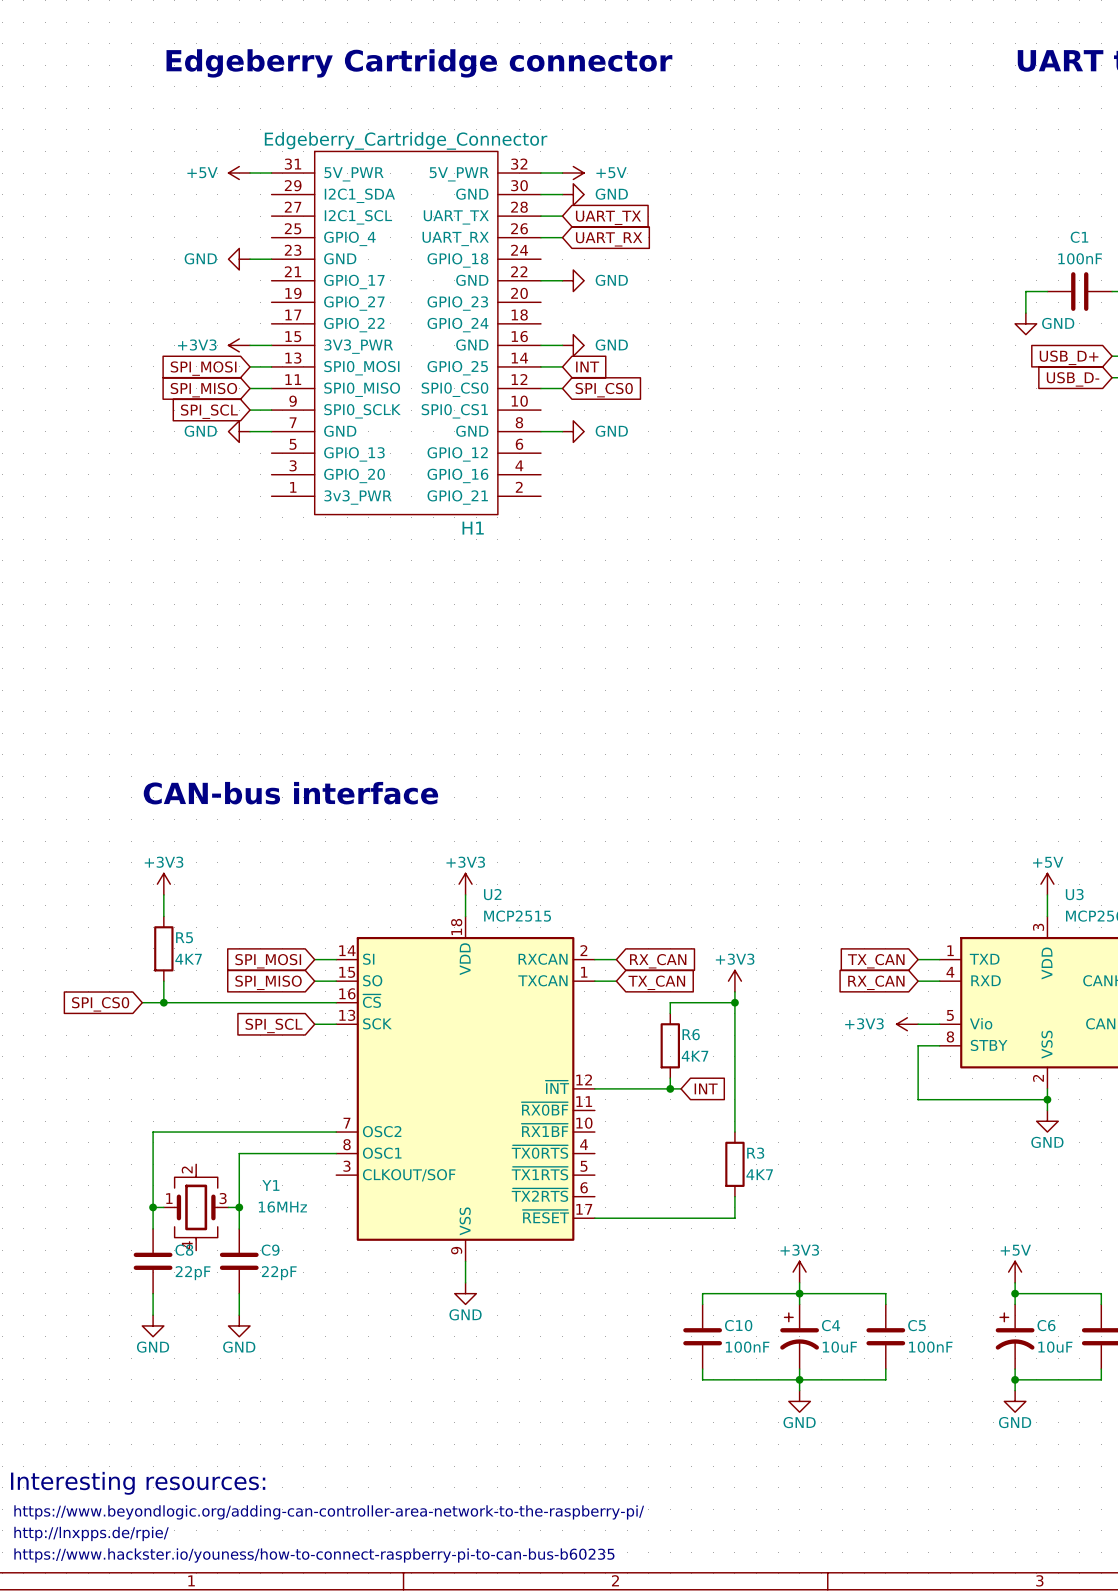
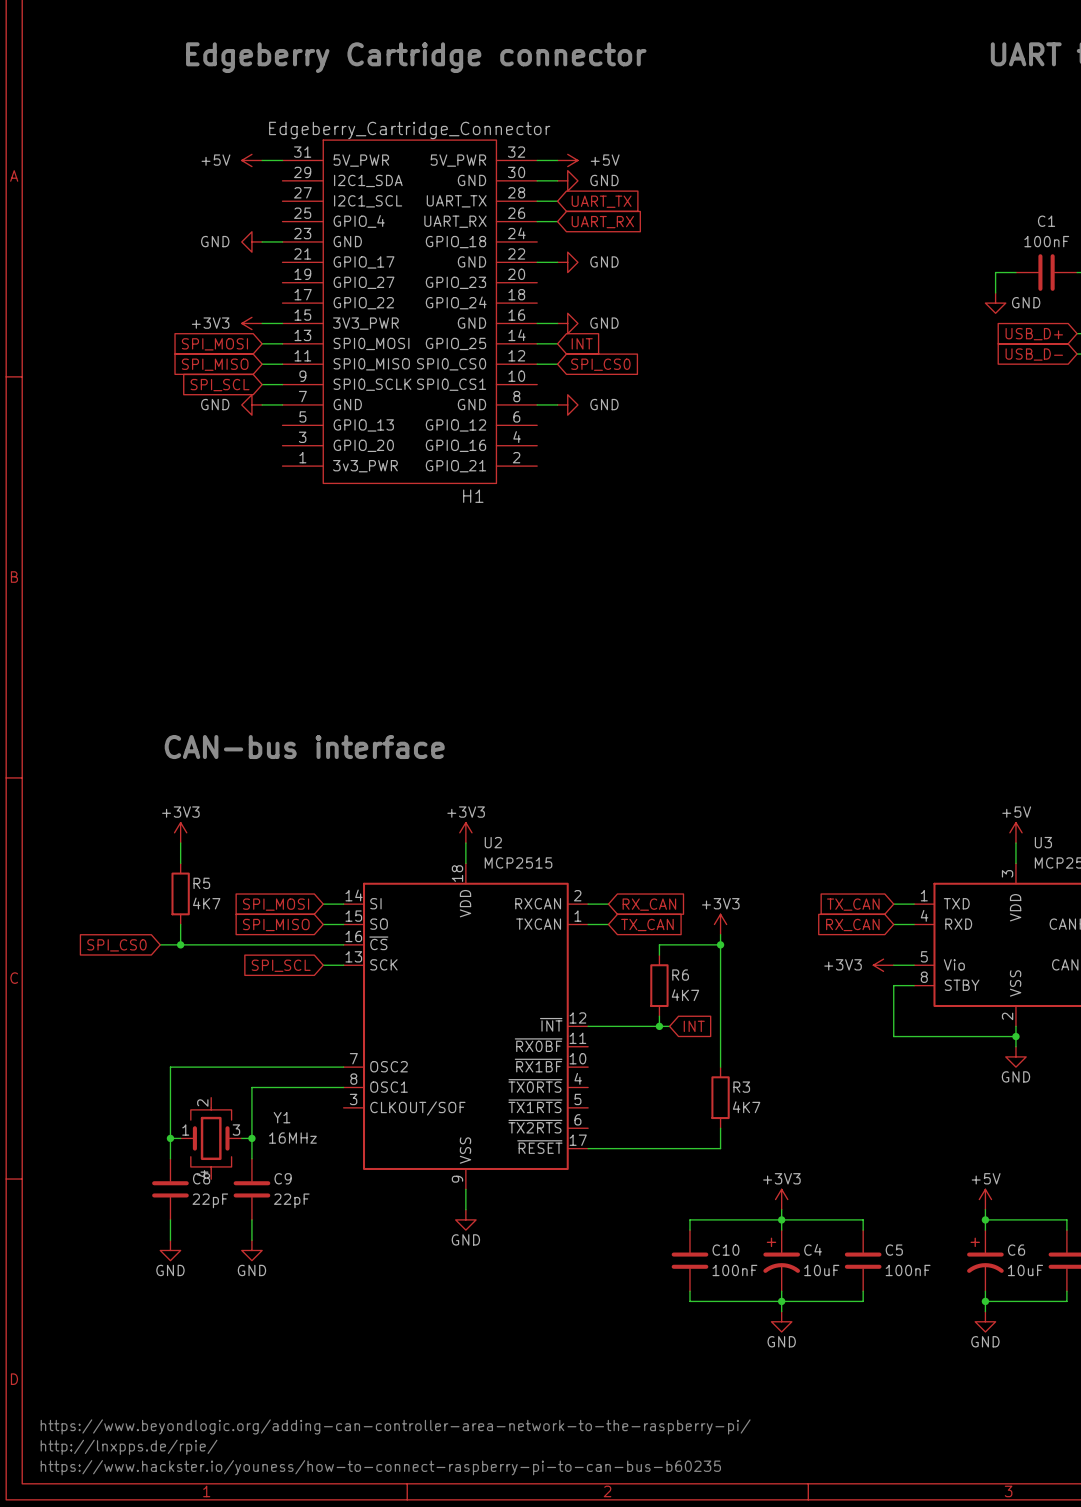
text: Interesting resources: (138, 1483) -> none

